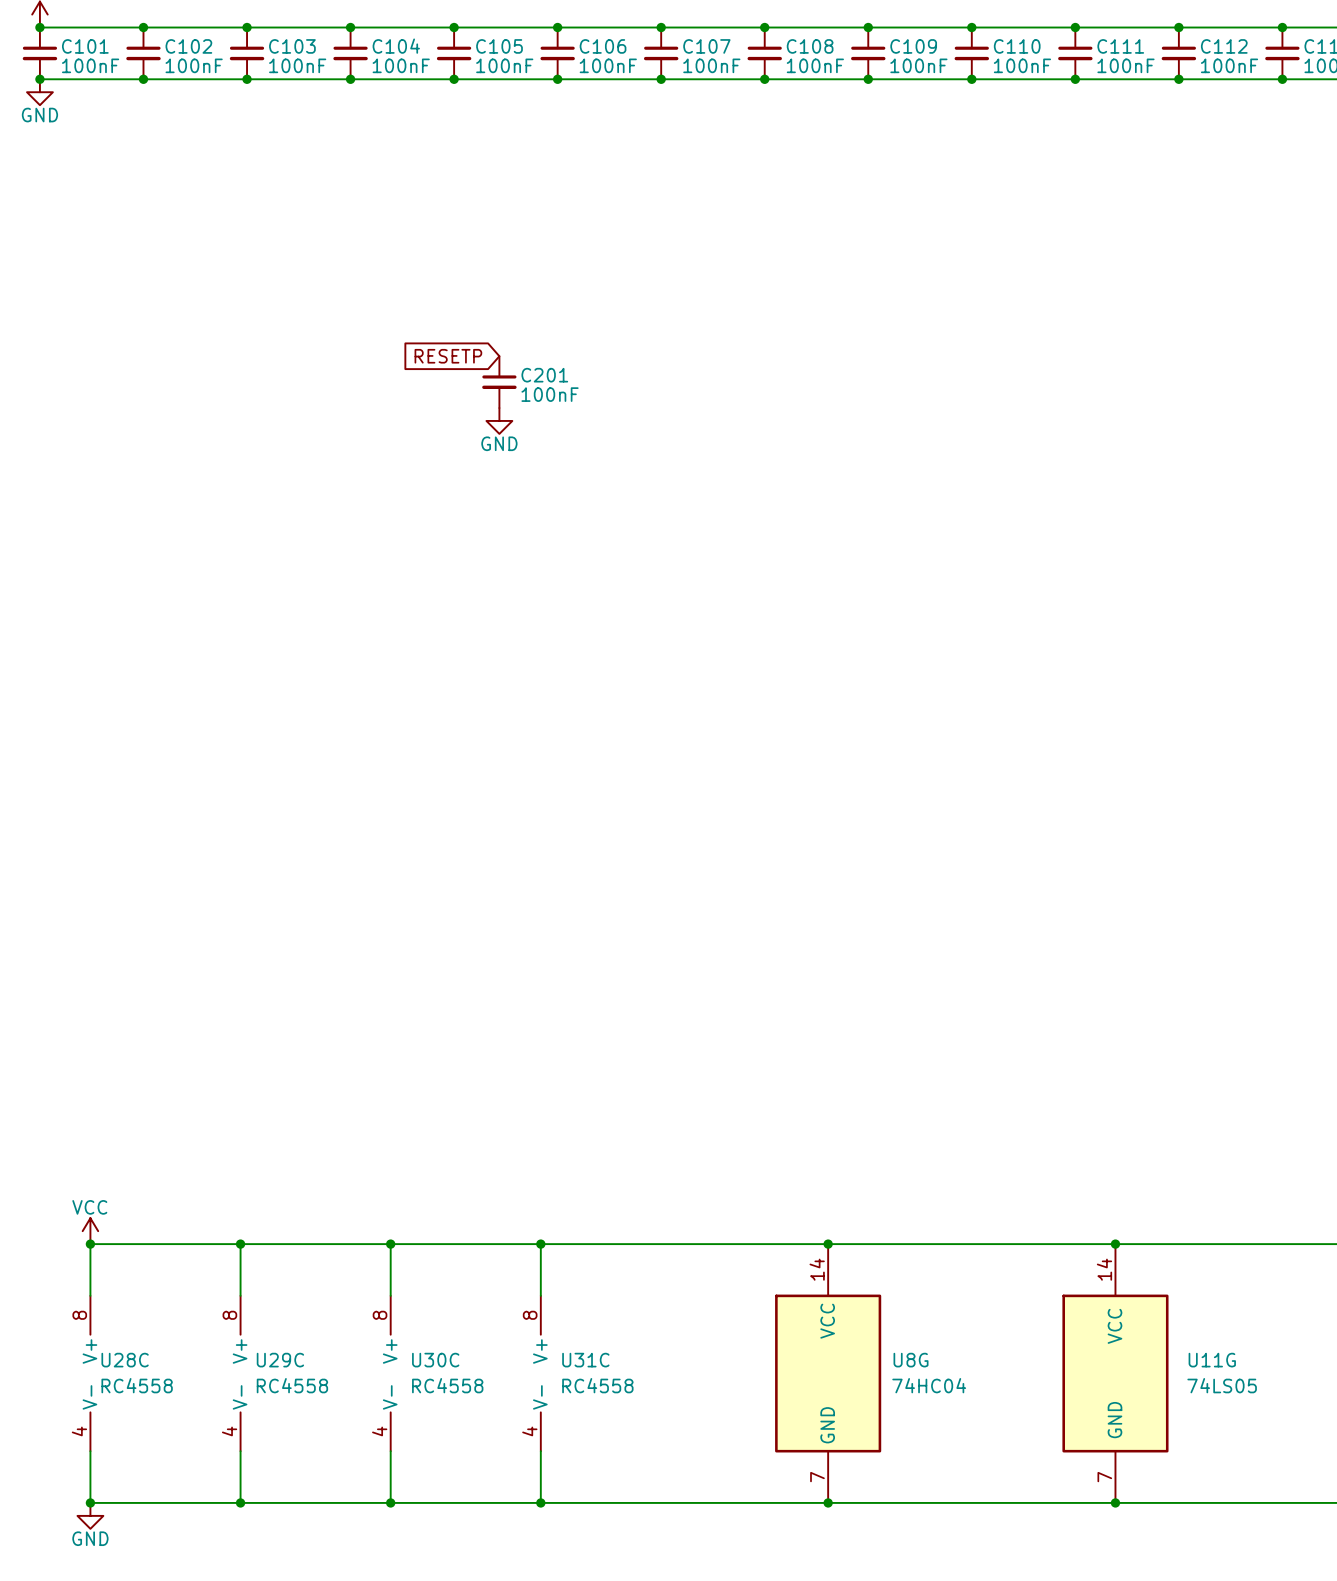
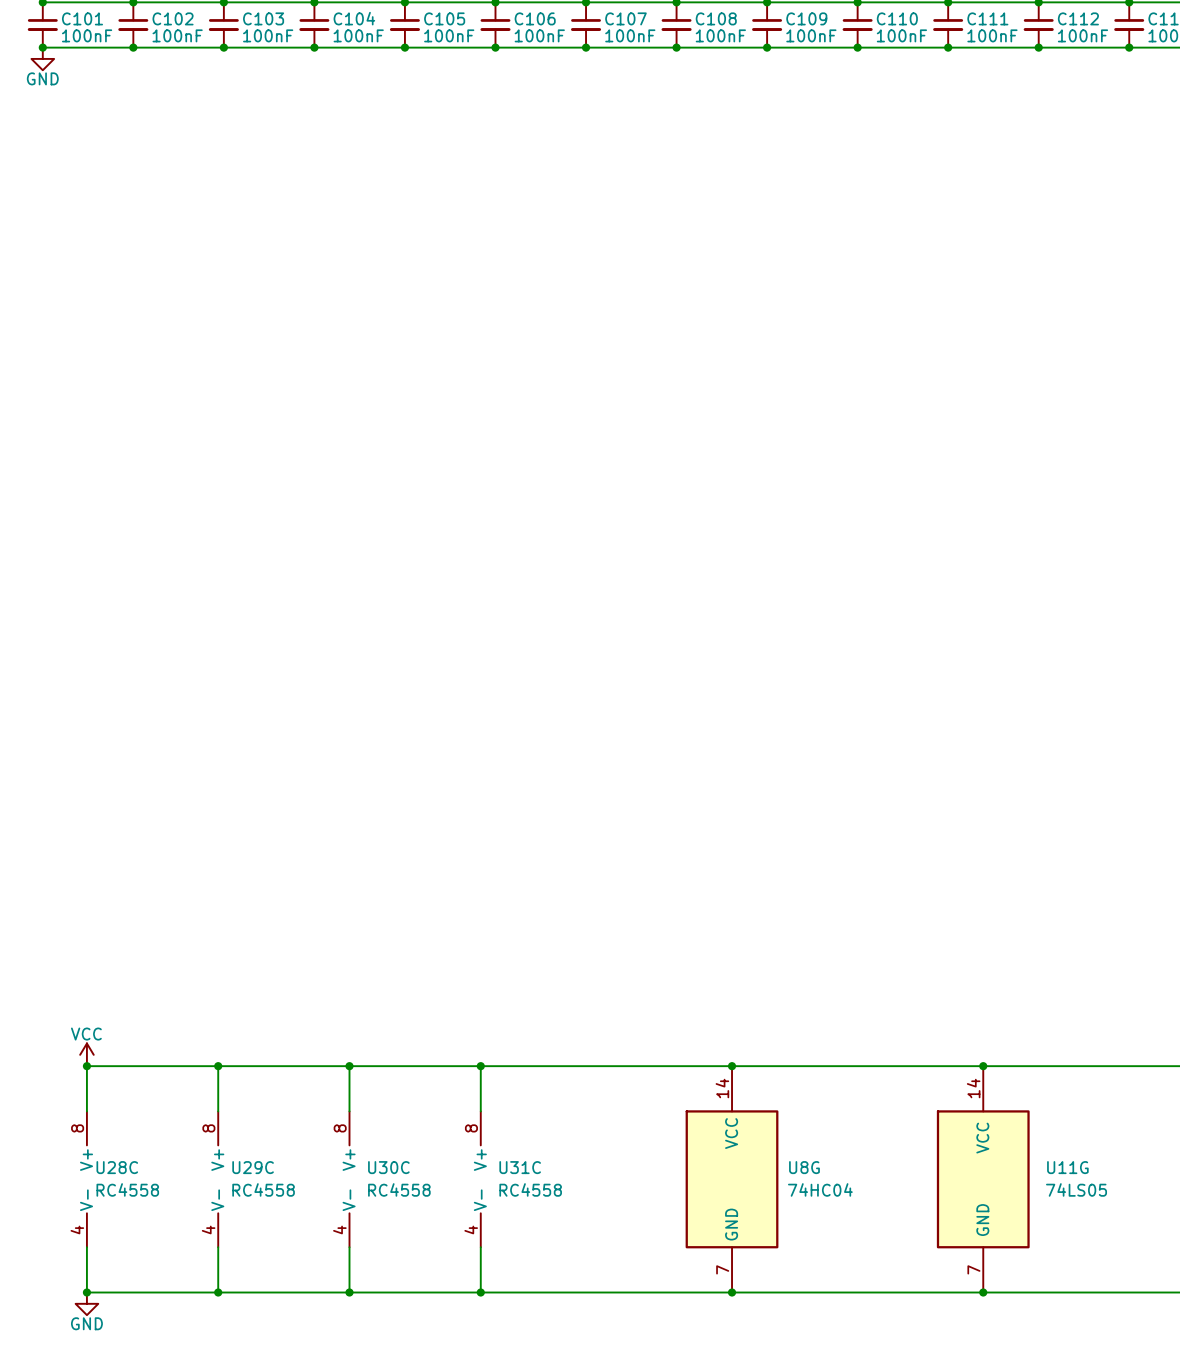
global label: RESETP (448, 356) -> none
C201: 100nF (499, 382) -> none
power symbol: GND (499, 420) -> none

